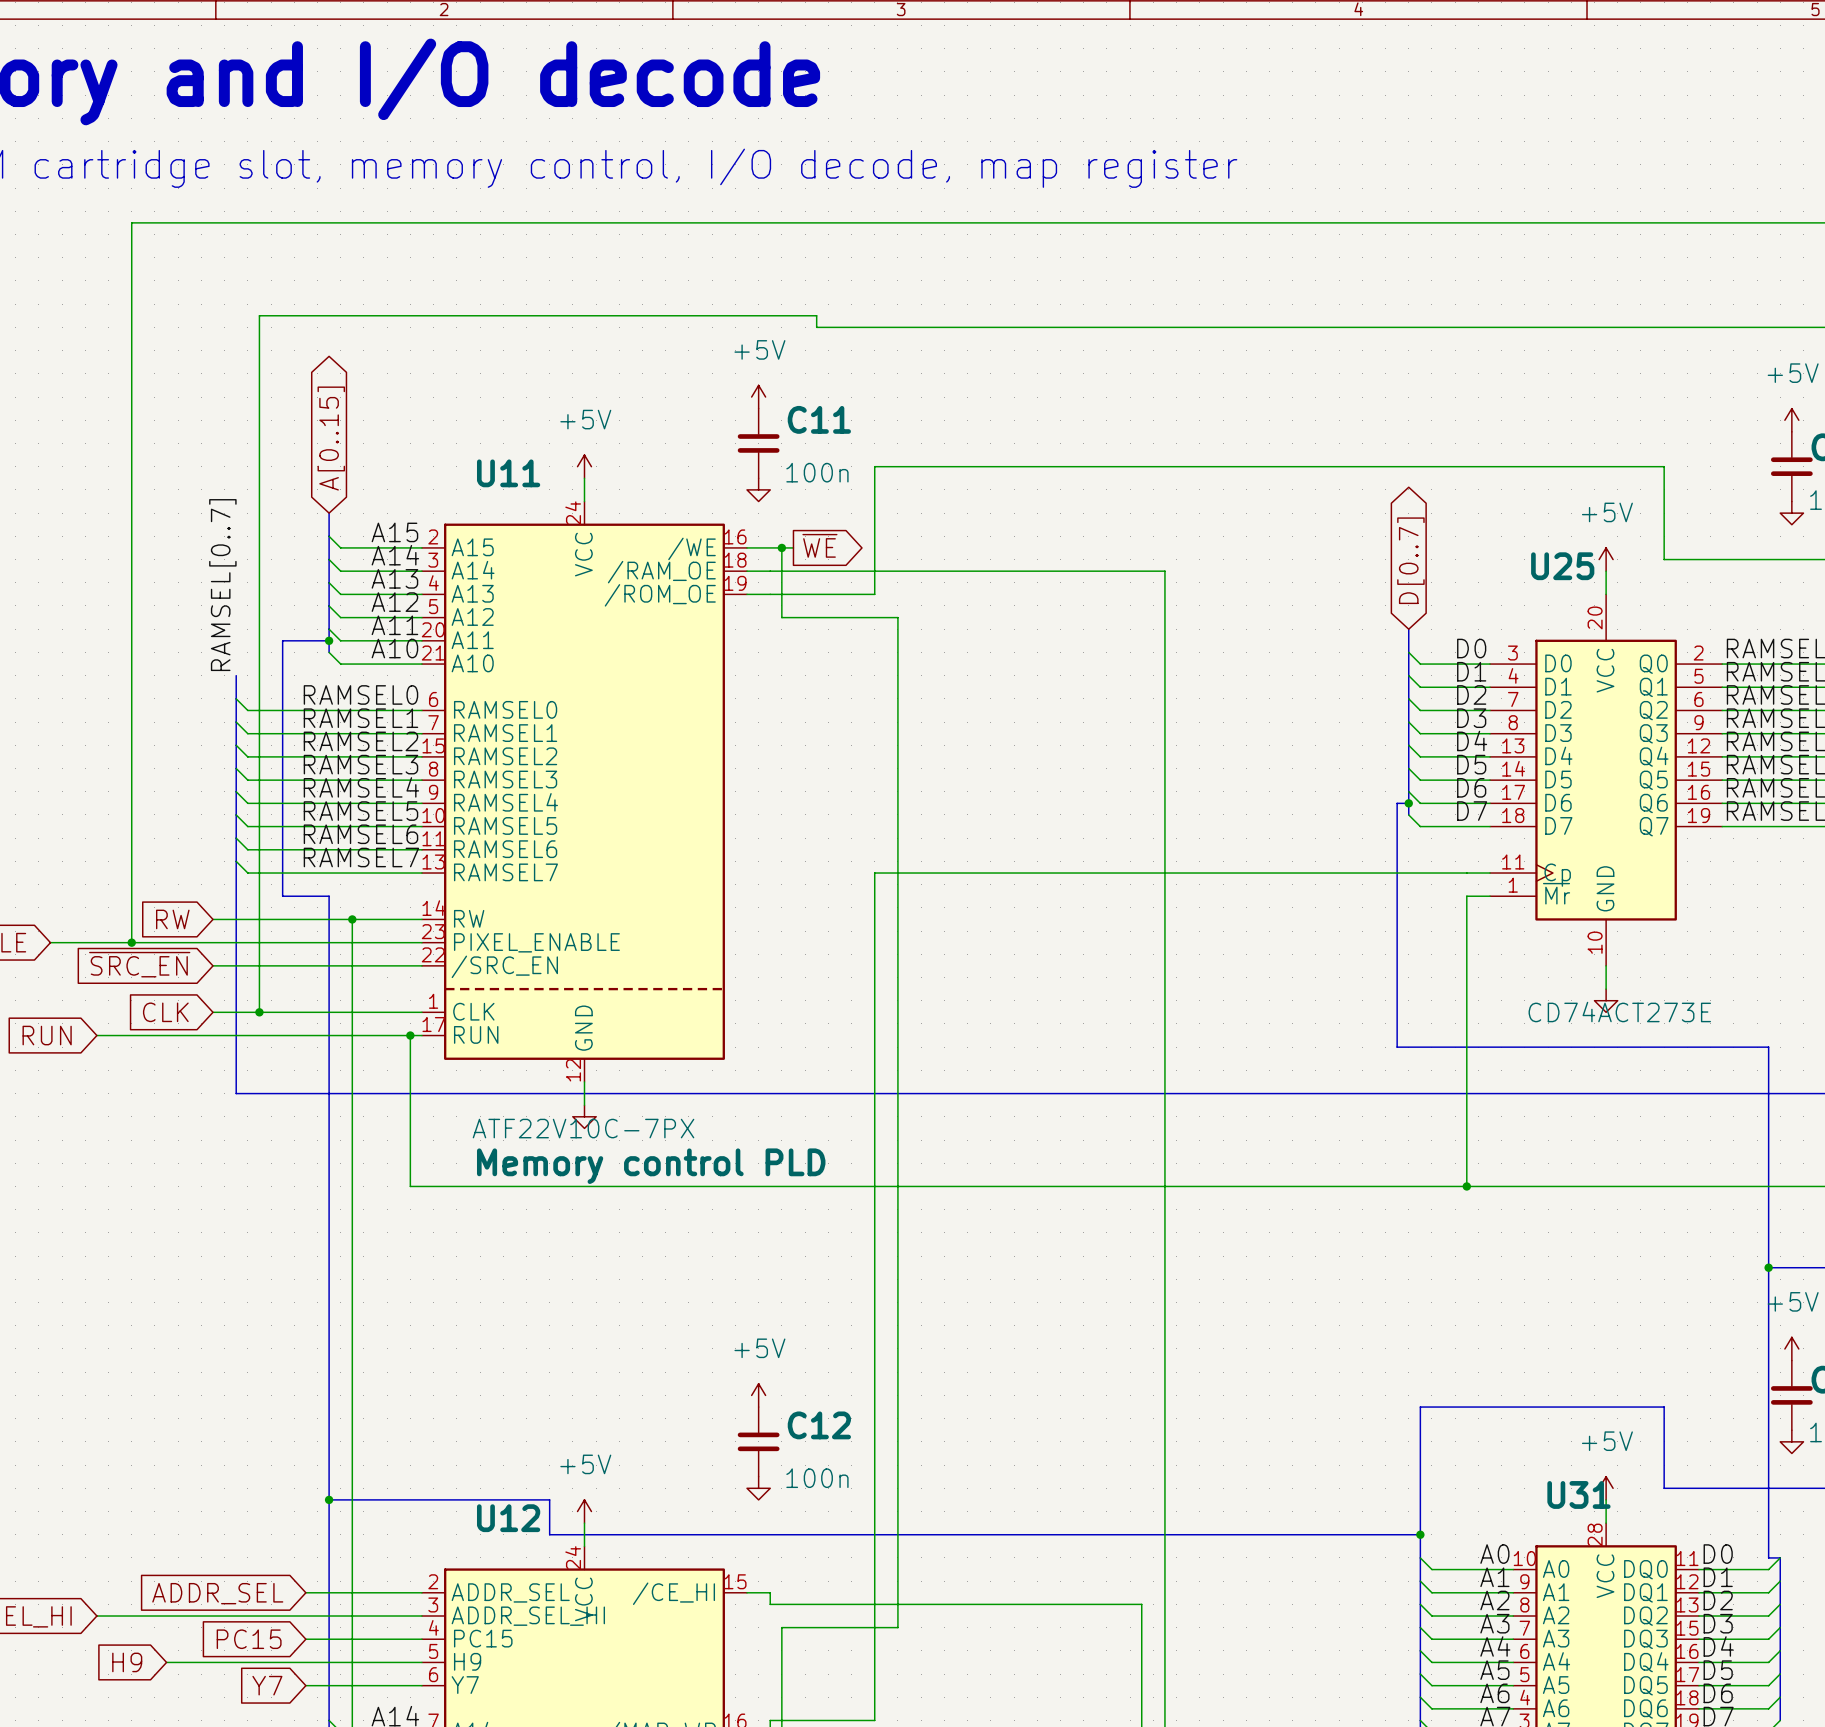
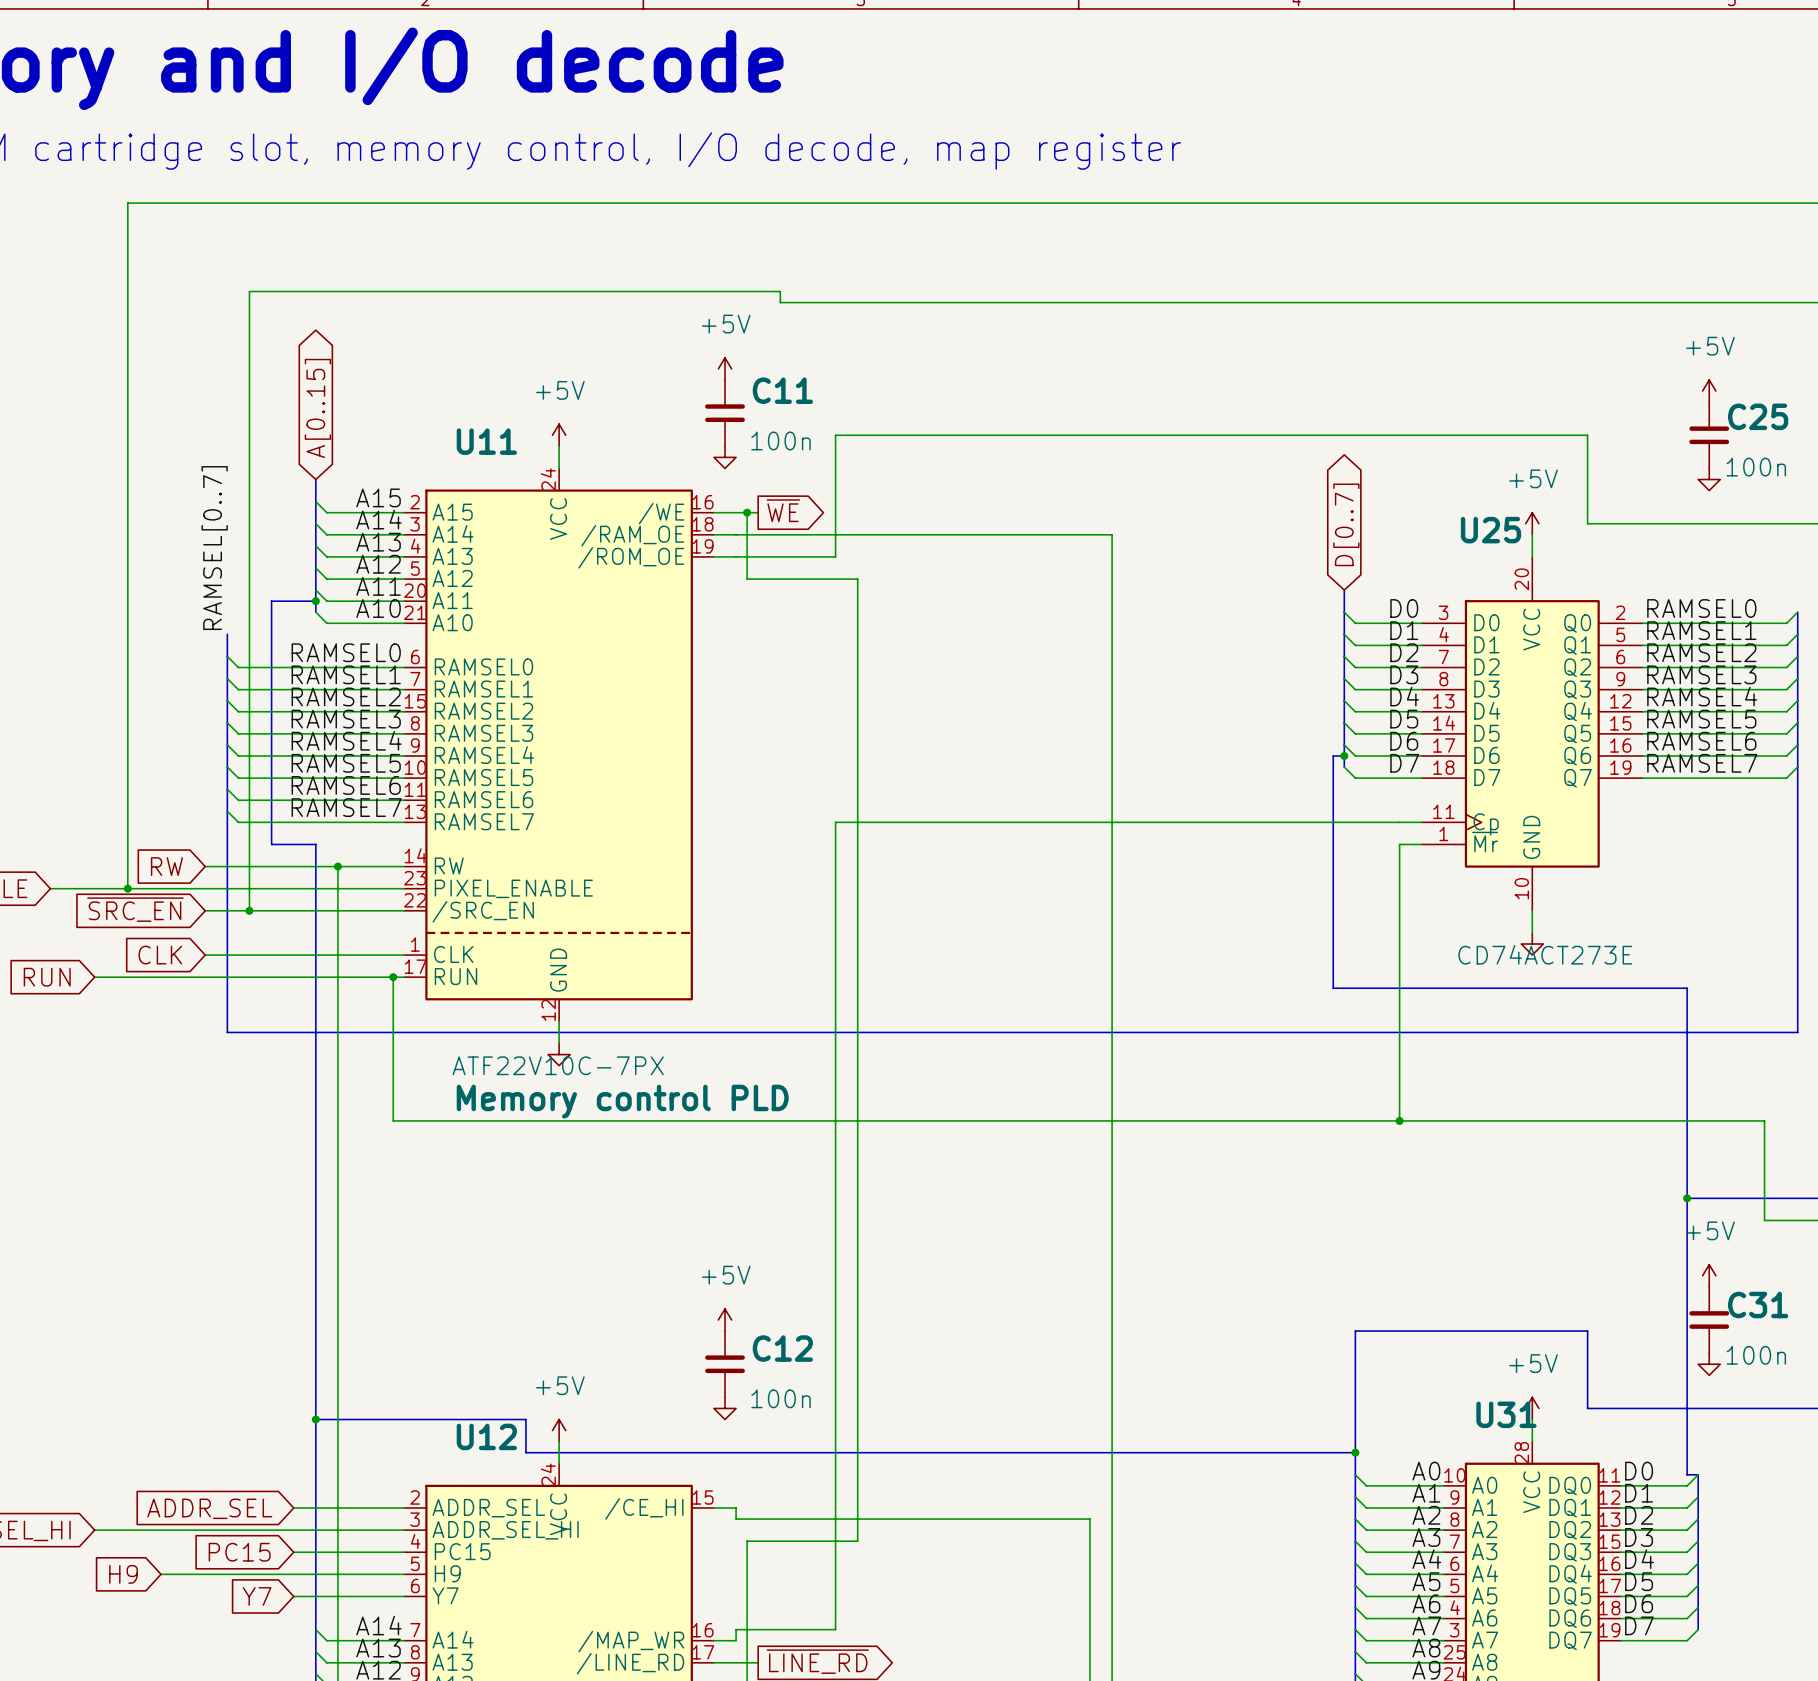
wire: (259, 965) (259, 1012) -> none
junction position: (259, 1012) -> (249, 910)

